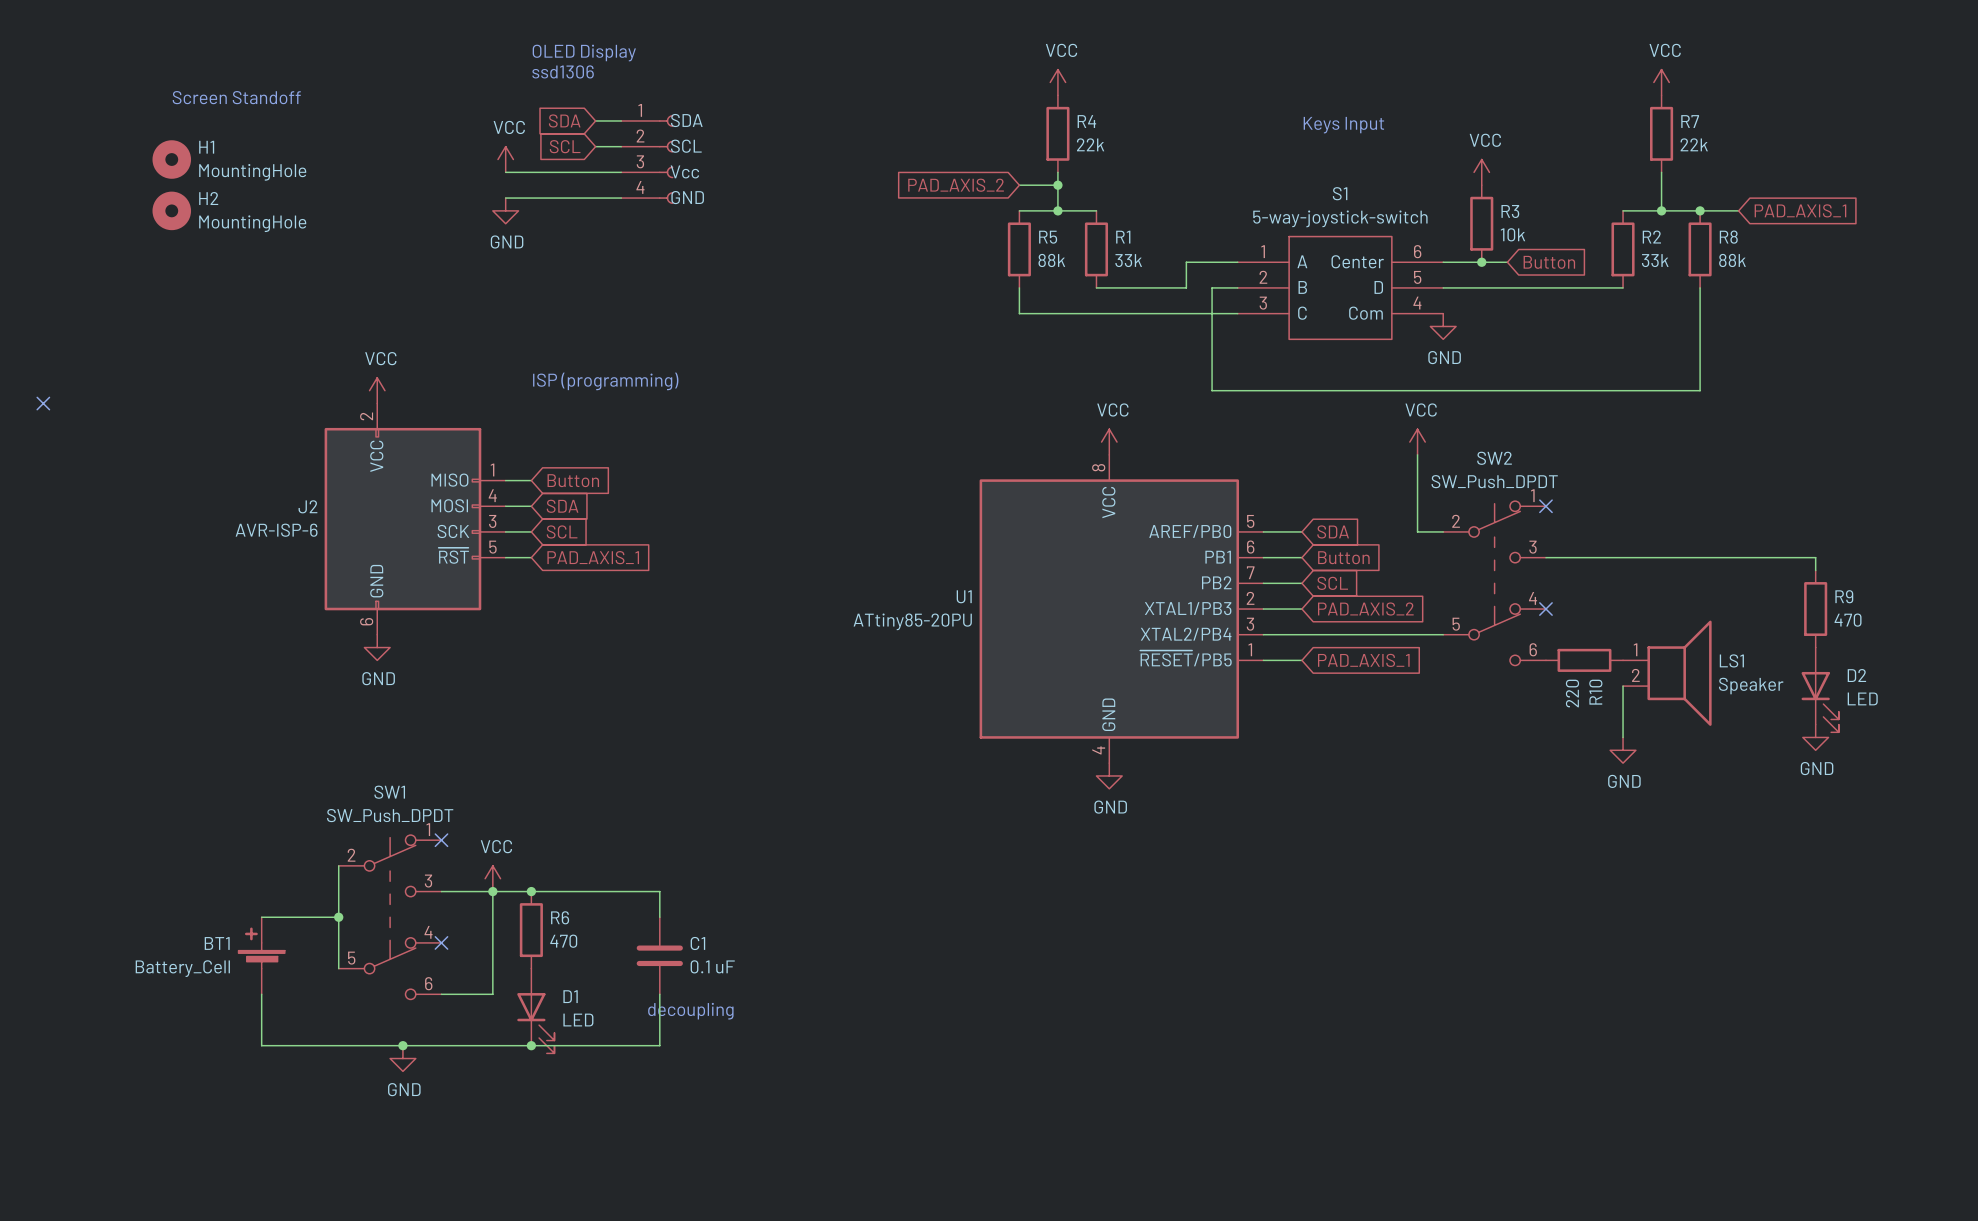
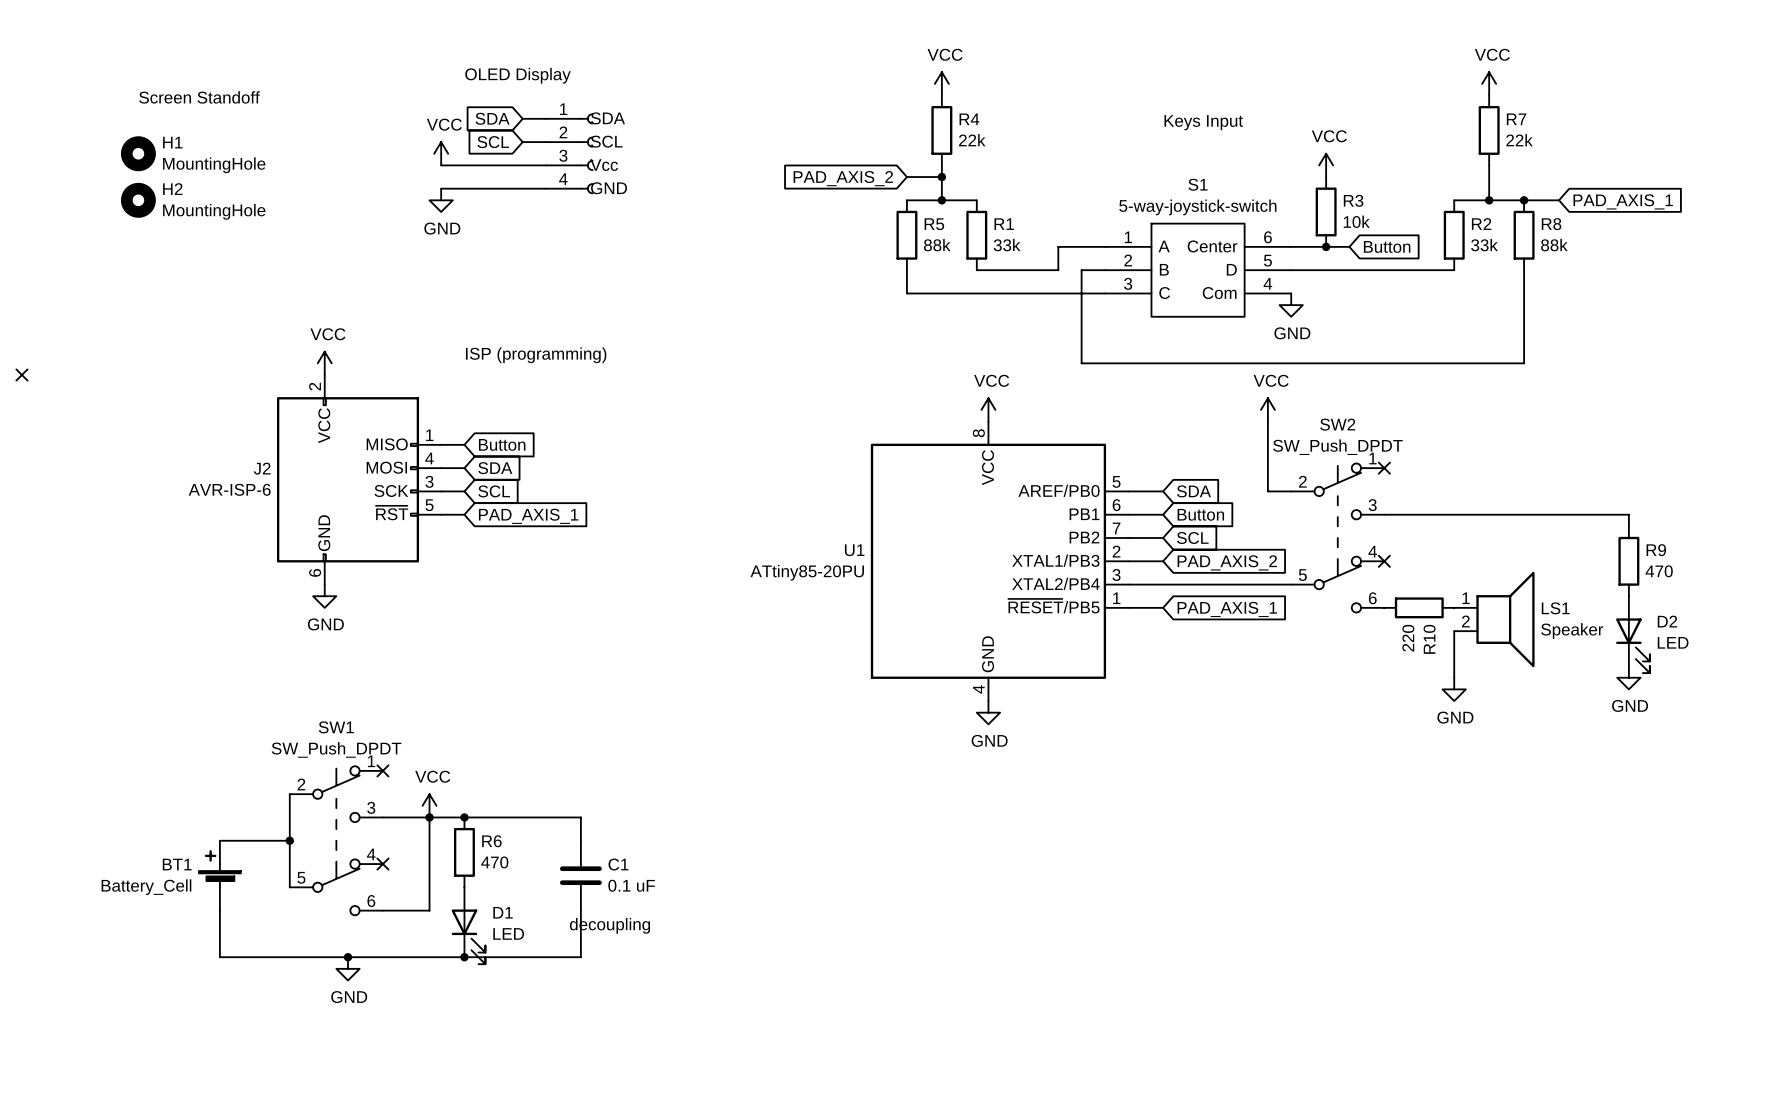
text: OLED Display (584, 53) -> none
text: ssd1306 (563, 71) -> OLED Display (517, 75)

